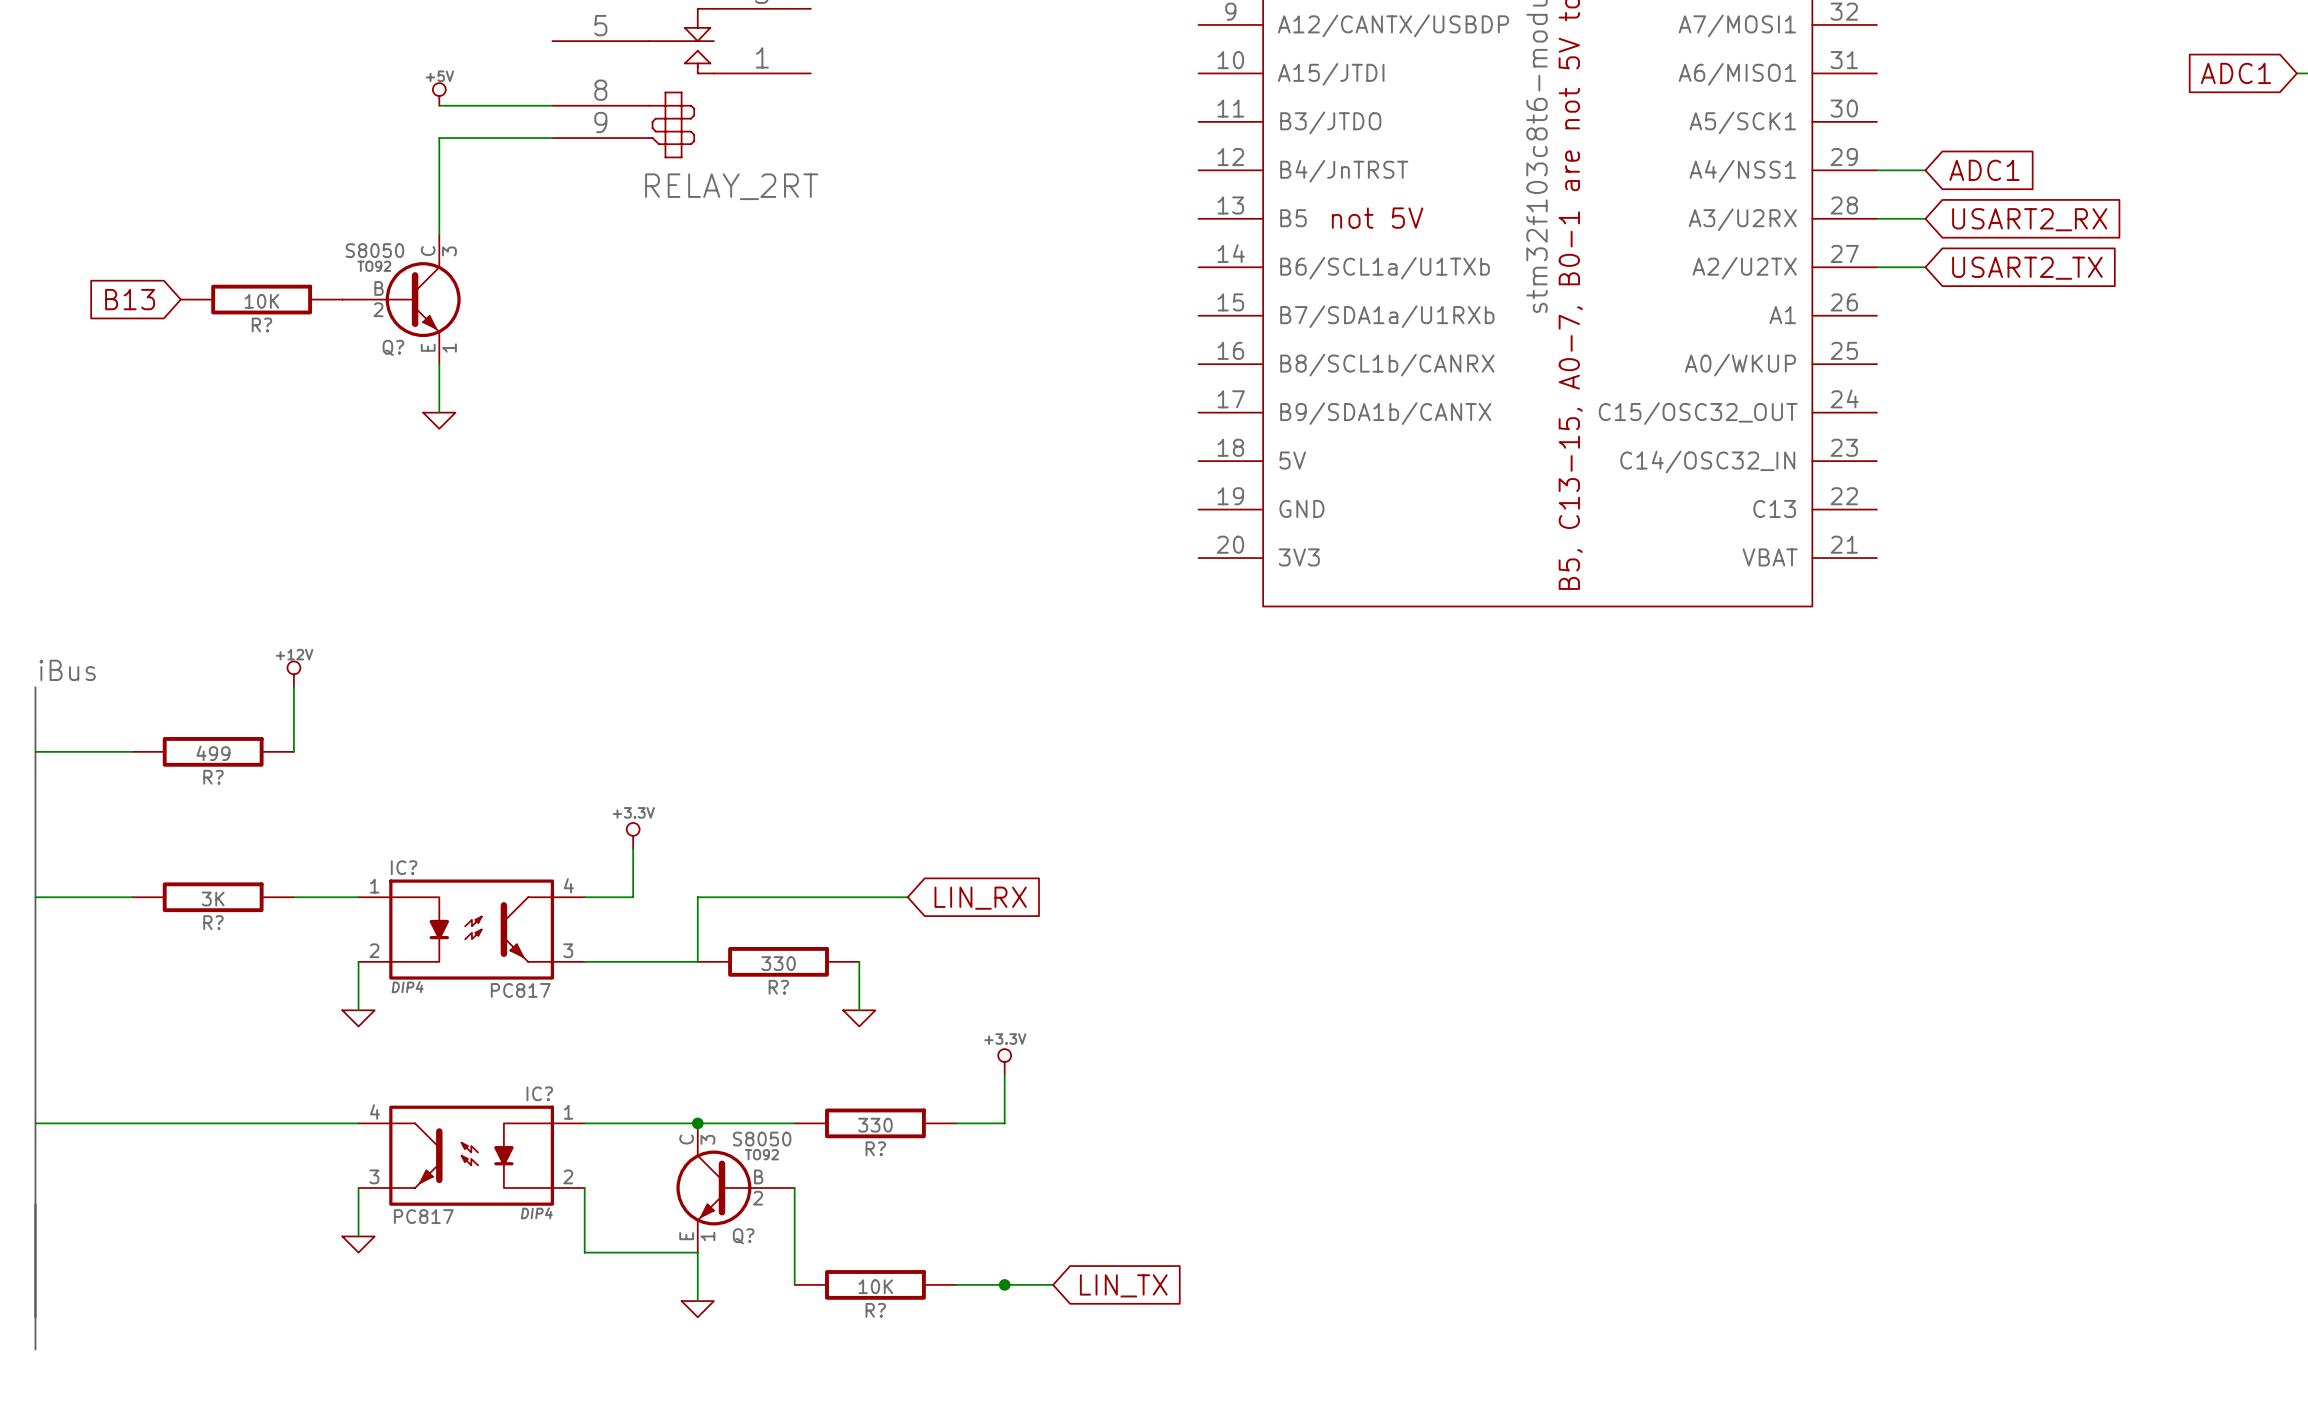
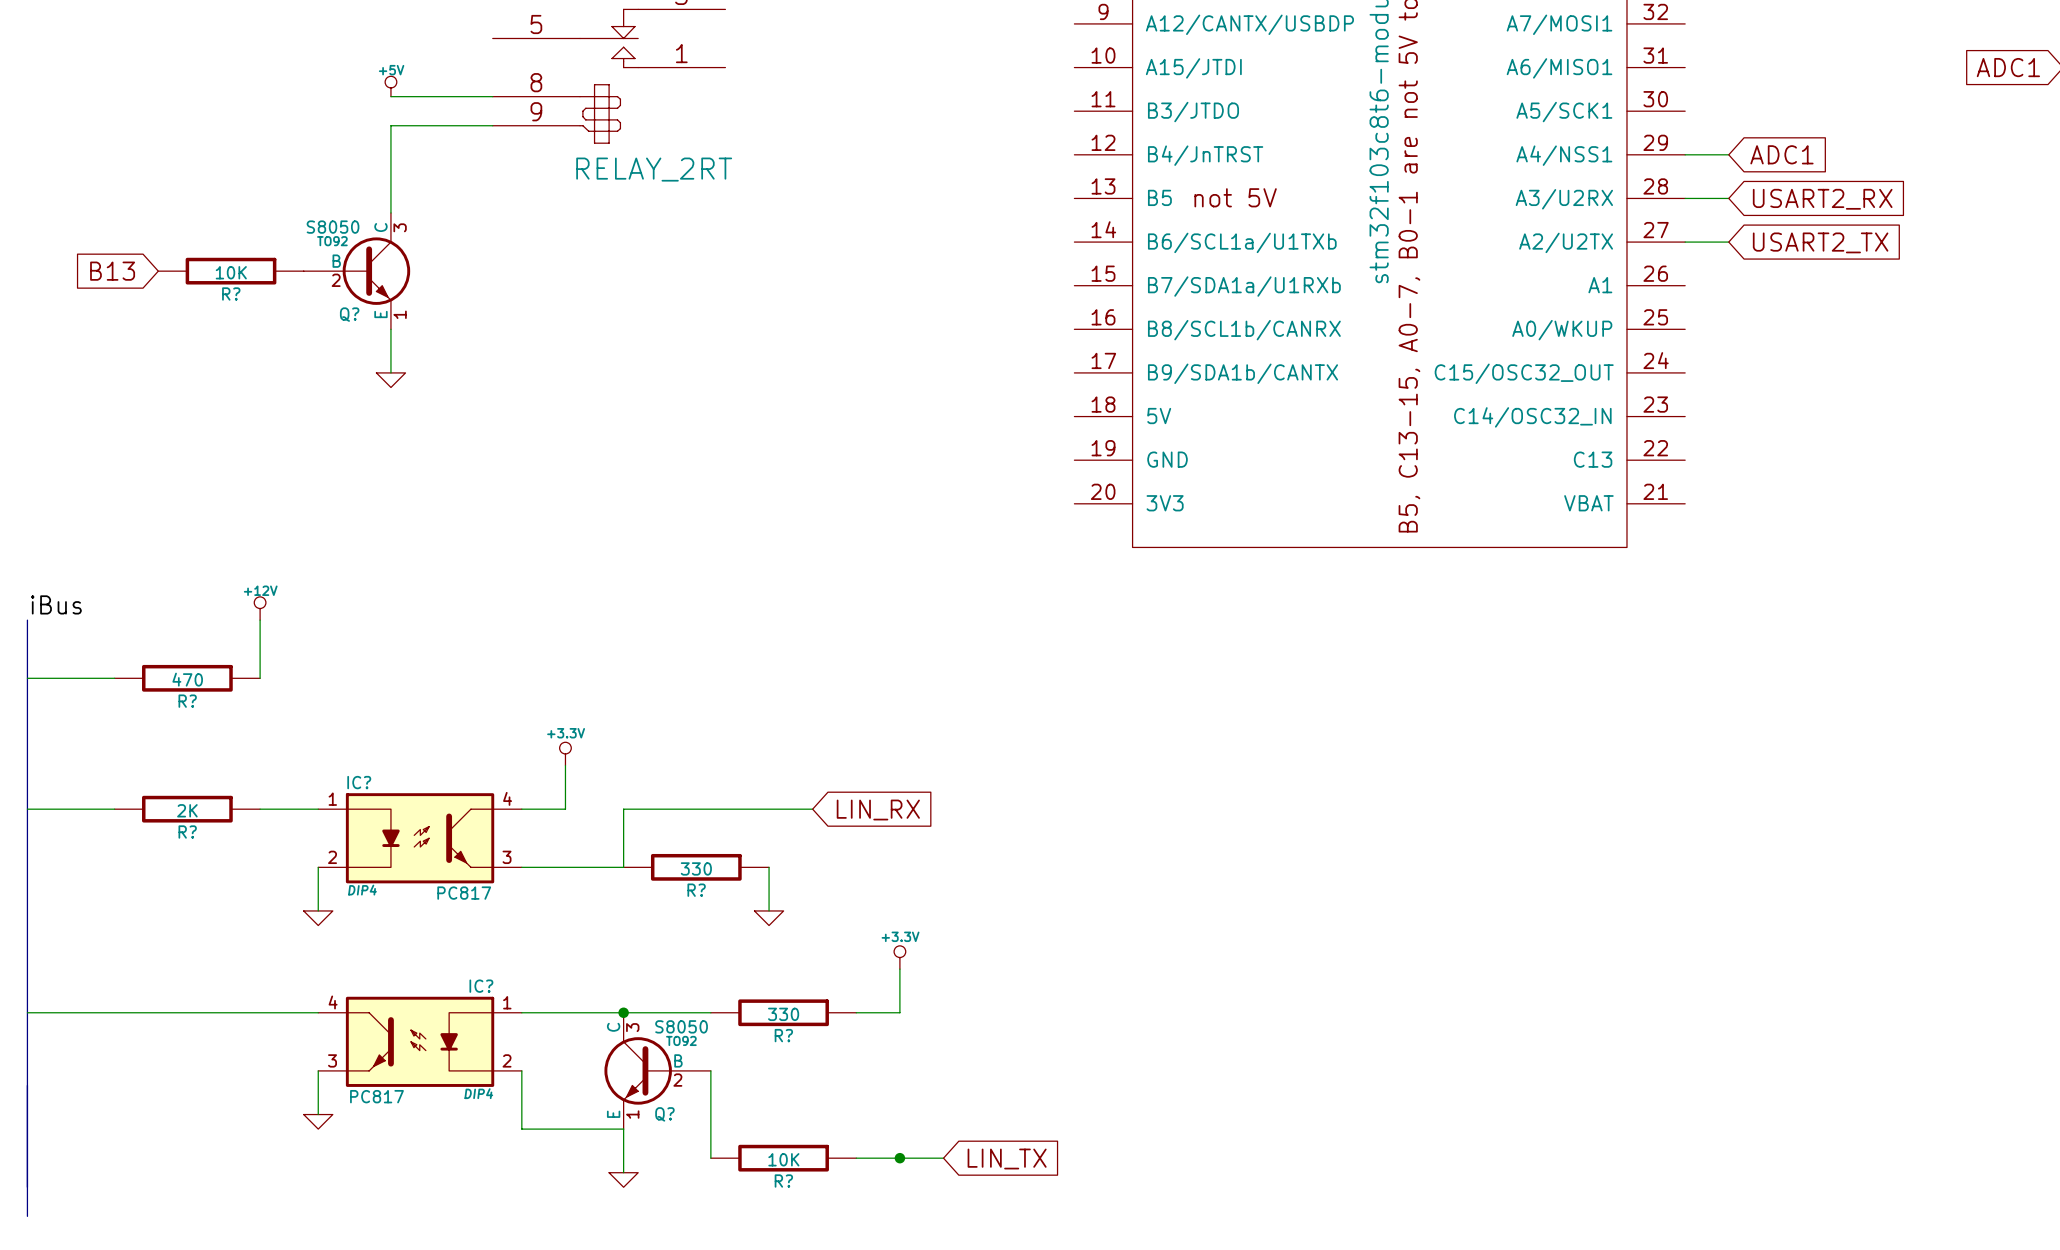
R? value: 499 (213, 753) -> 470 (187, 679)
R? value: 3K (213, 899) -> 2K (187, 810)

